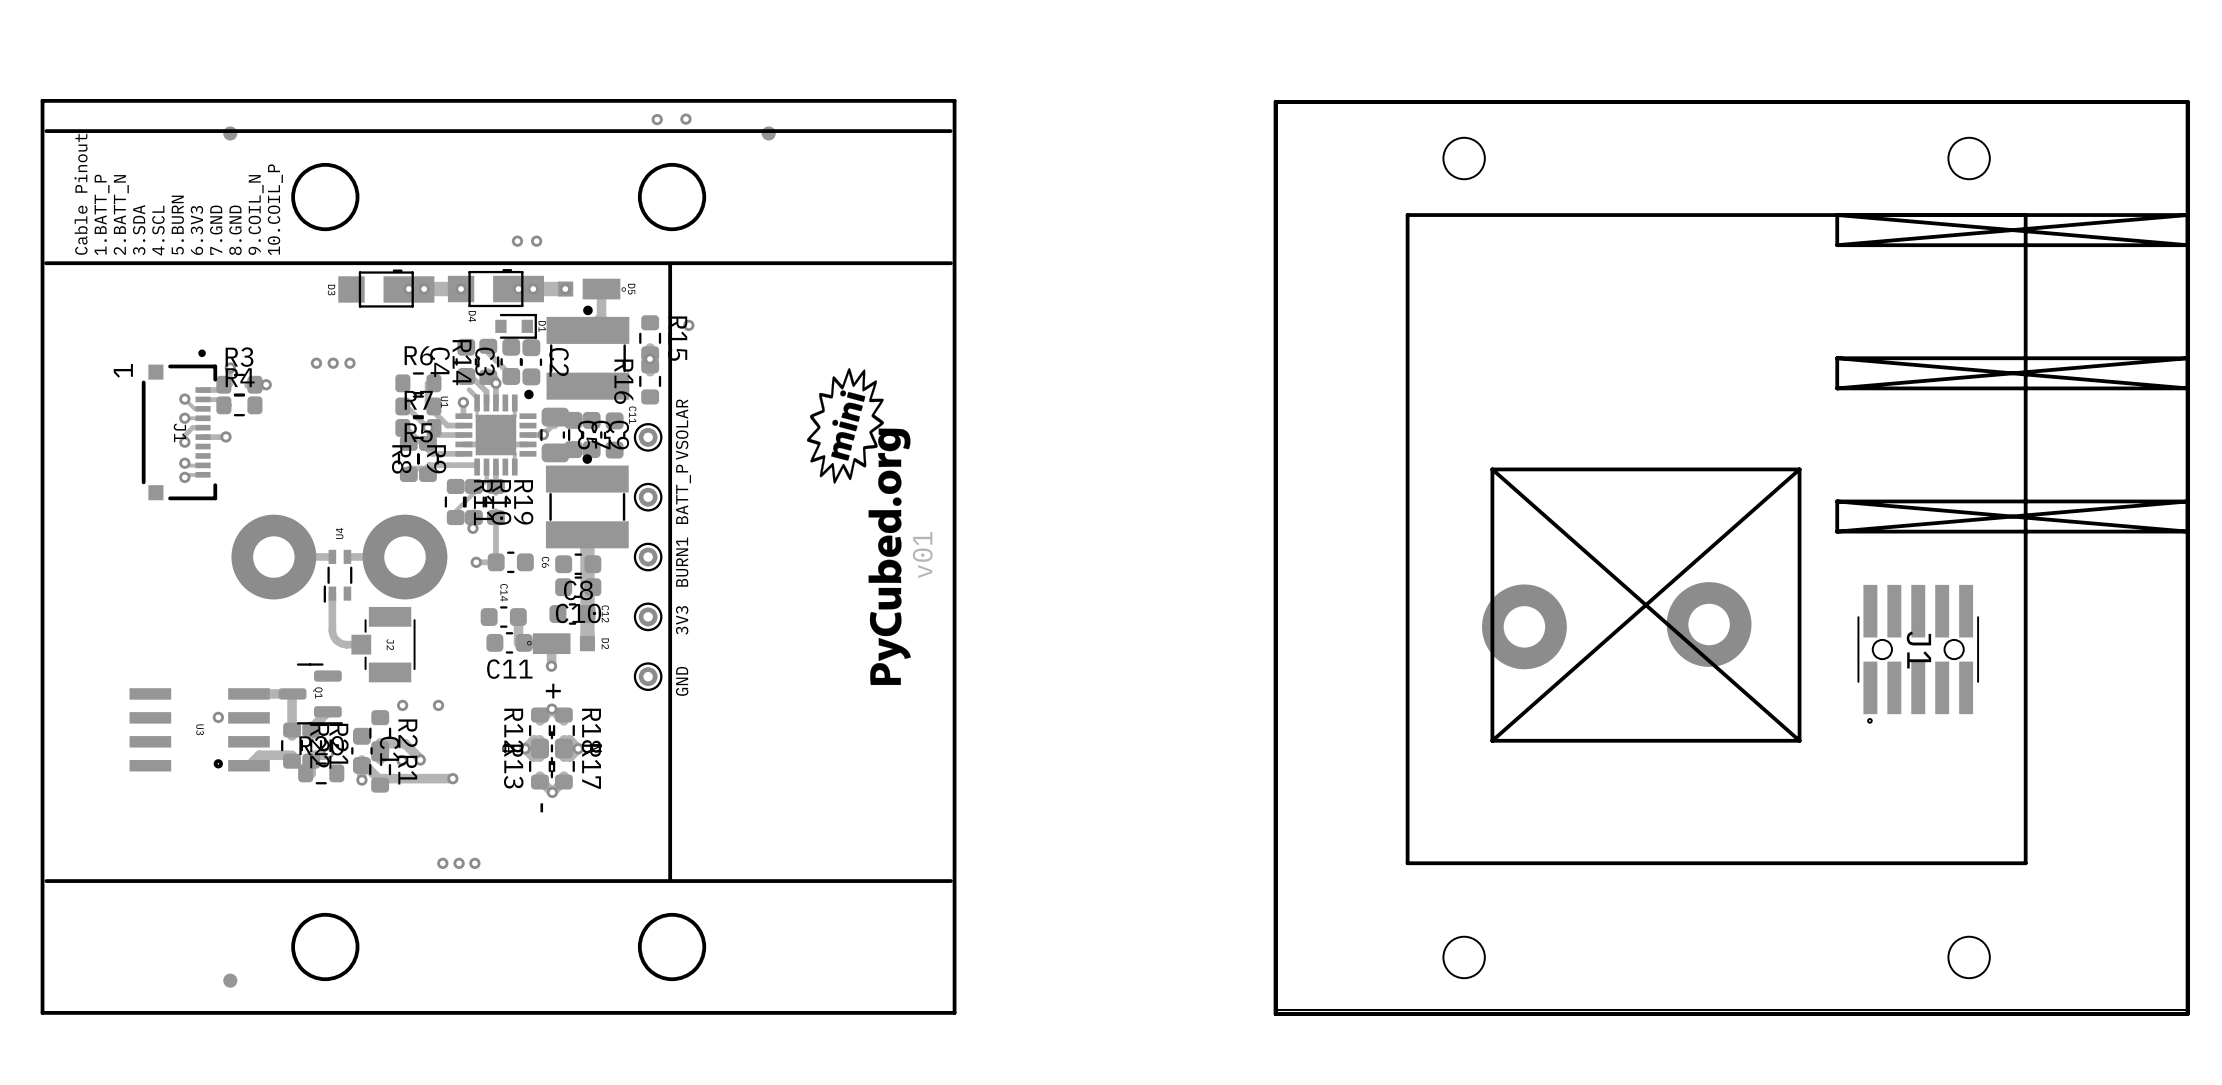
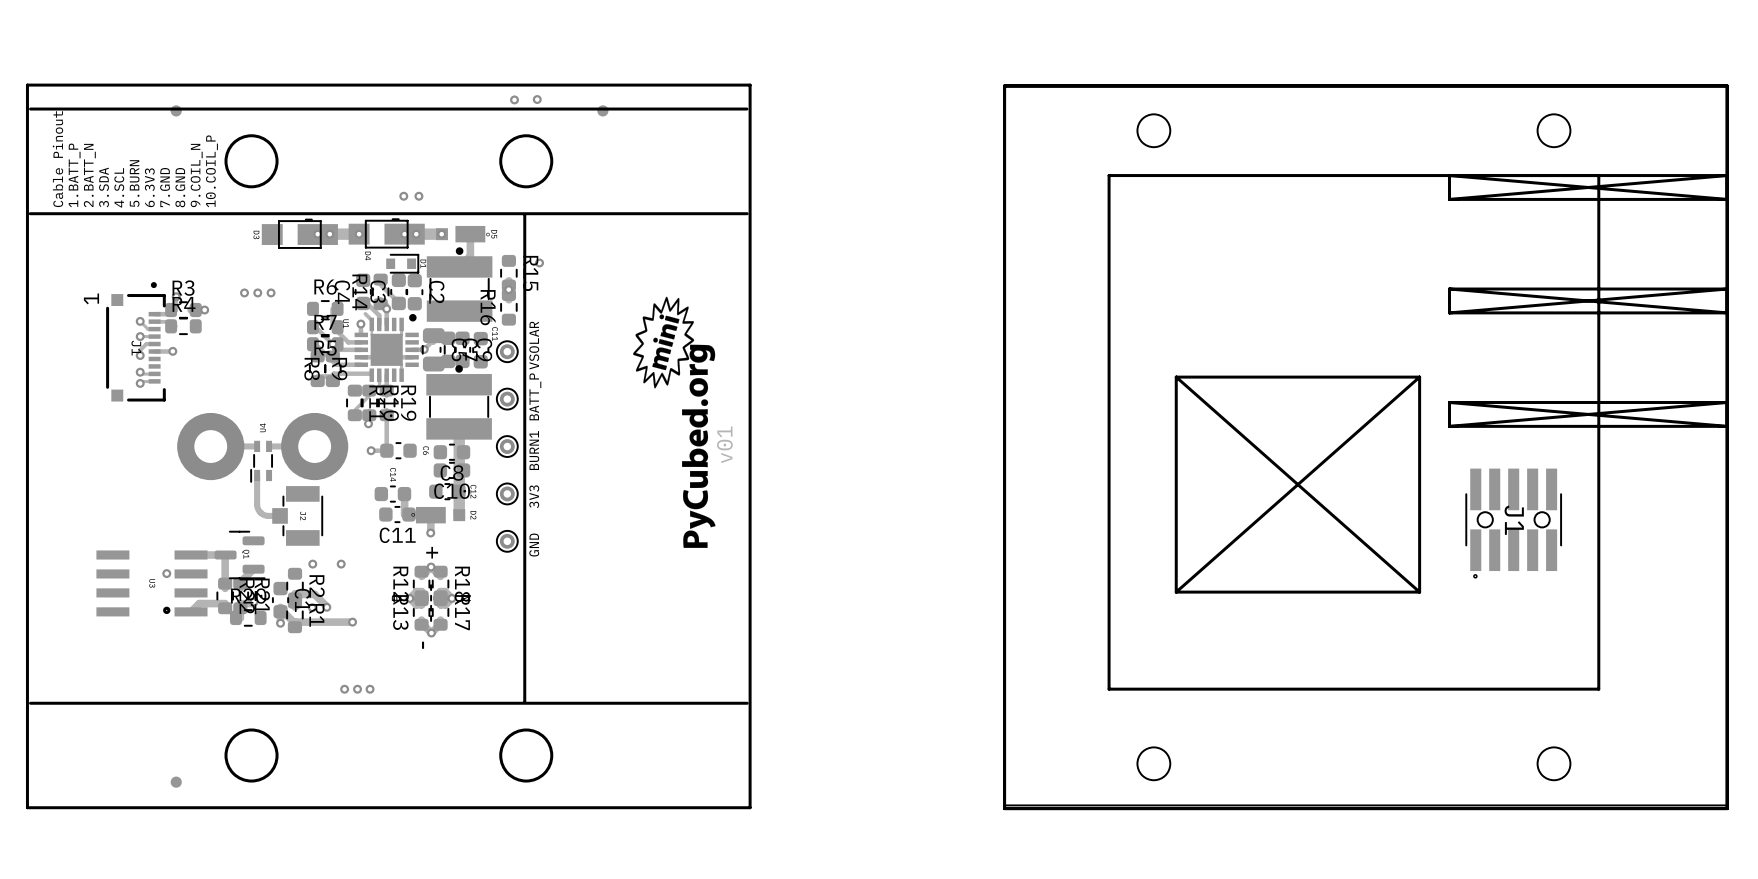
part: (1709, 624) -> none
part: (1524, 626) -> none

